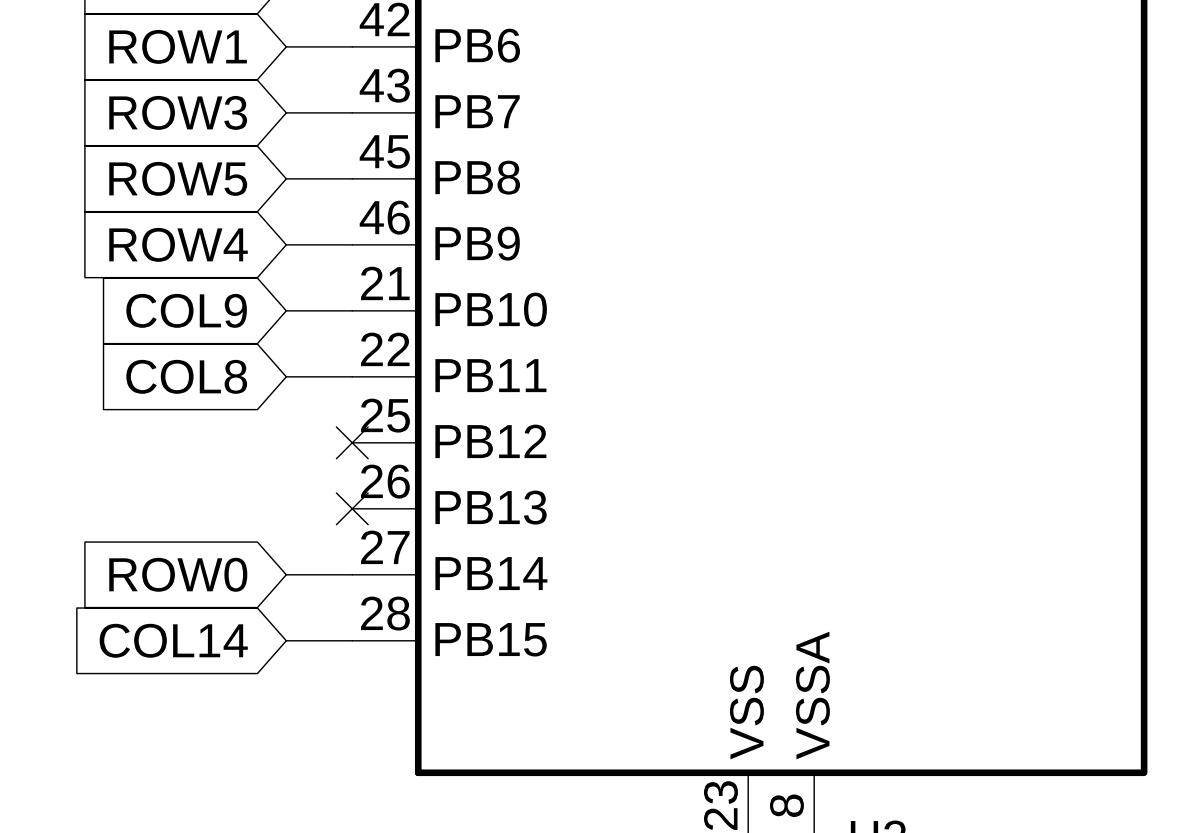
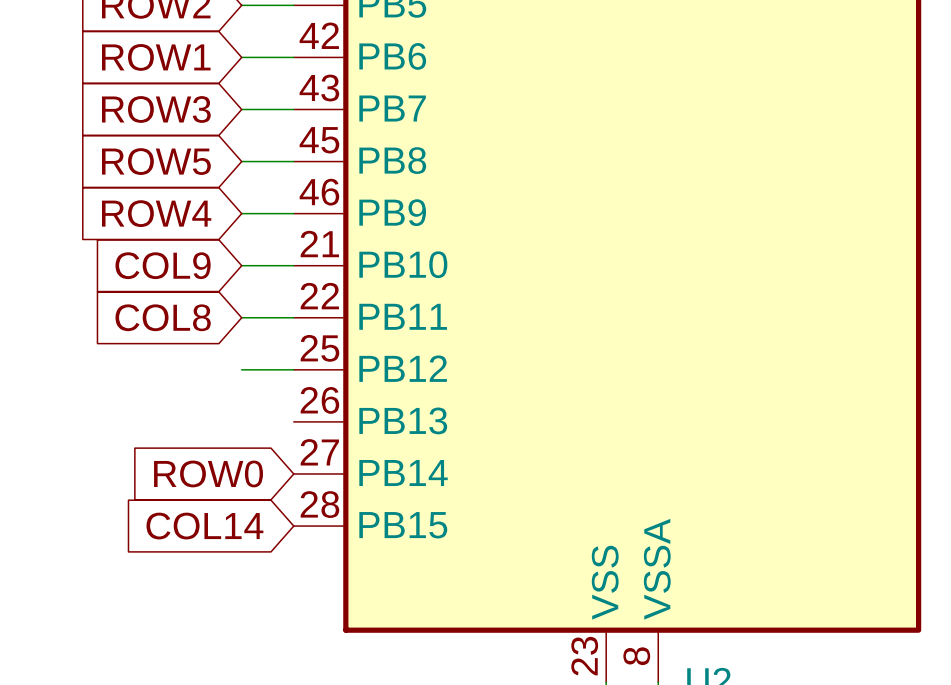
no-connect mark: (352, 442) -> none
no-connect mark: (352, 508) -> none
global label position: ROW0 (178, 574) -> ROW0 (208, 473)
wire: (286, 574) (352, 574) -> (241, 369) (293, 369)
global label position: COL14 (173, 640) -> COL14 (204, 526)
wire: (286, 640) (352, 640) -> none

